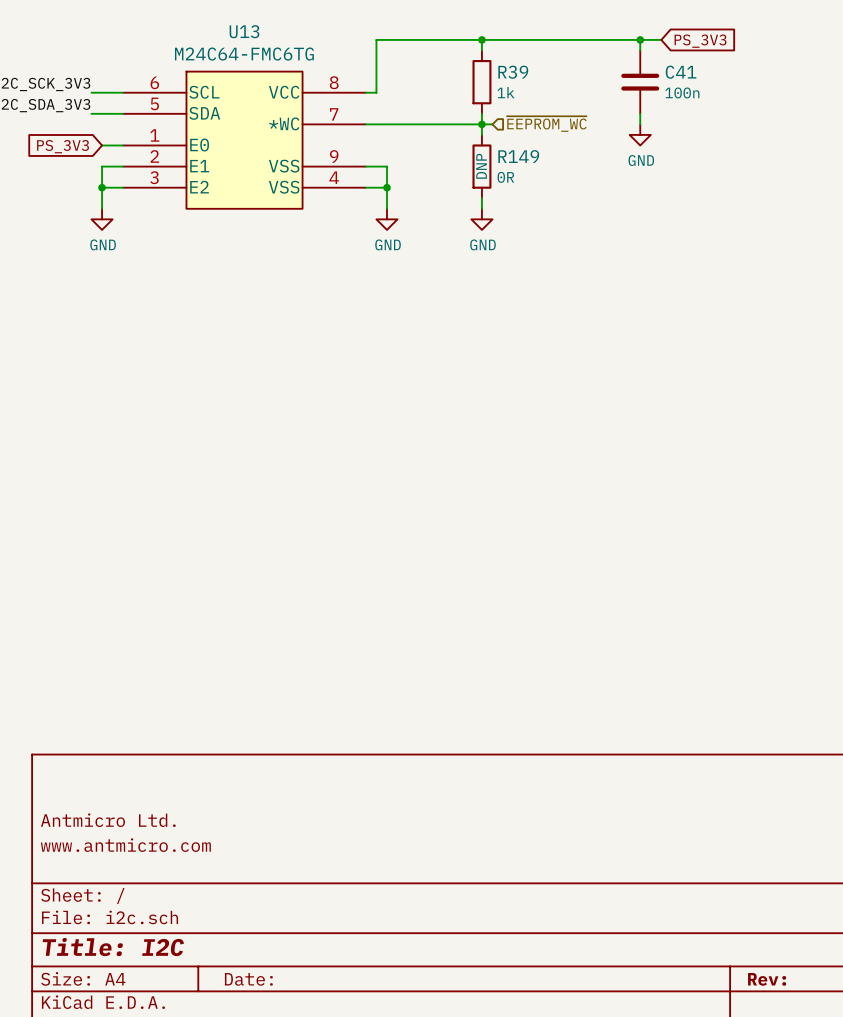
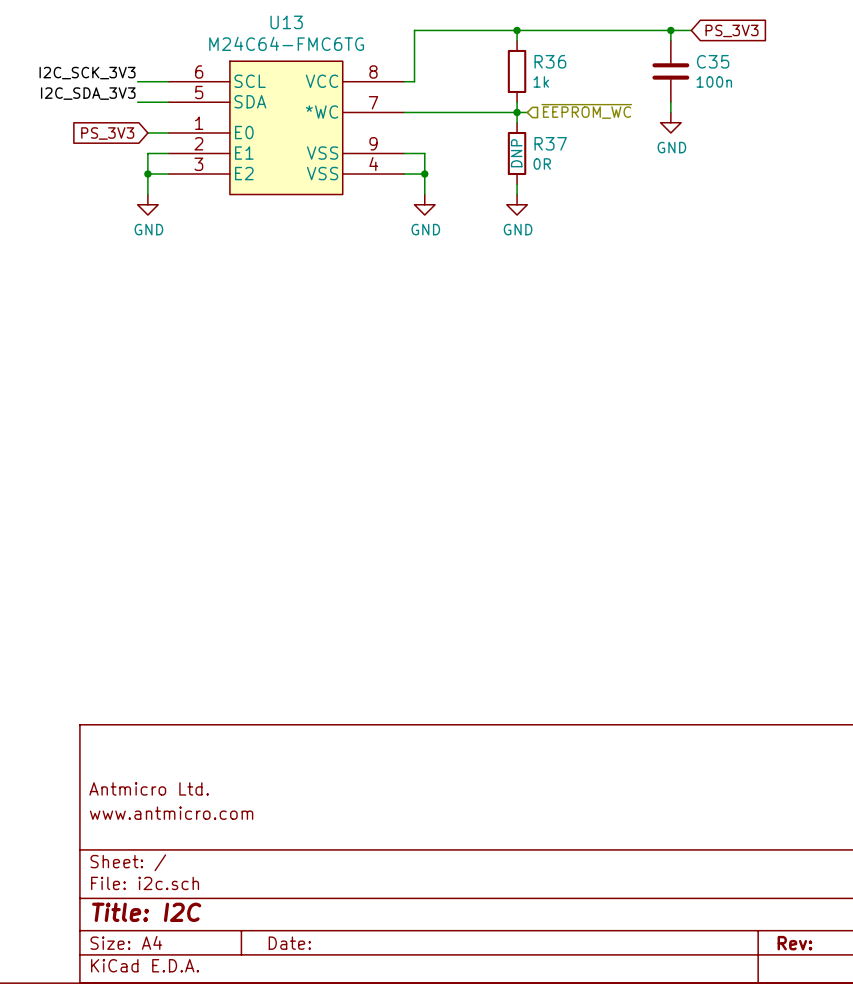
R39 name: R39 (513, 72) -> R36 (550, 61)
C41 name: C41 (681, 72) -> C35 (713, 61)
R149 name: R149 (518, 156) -> R37 (550, 143)

